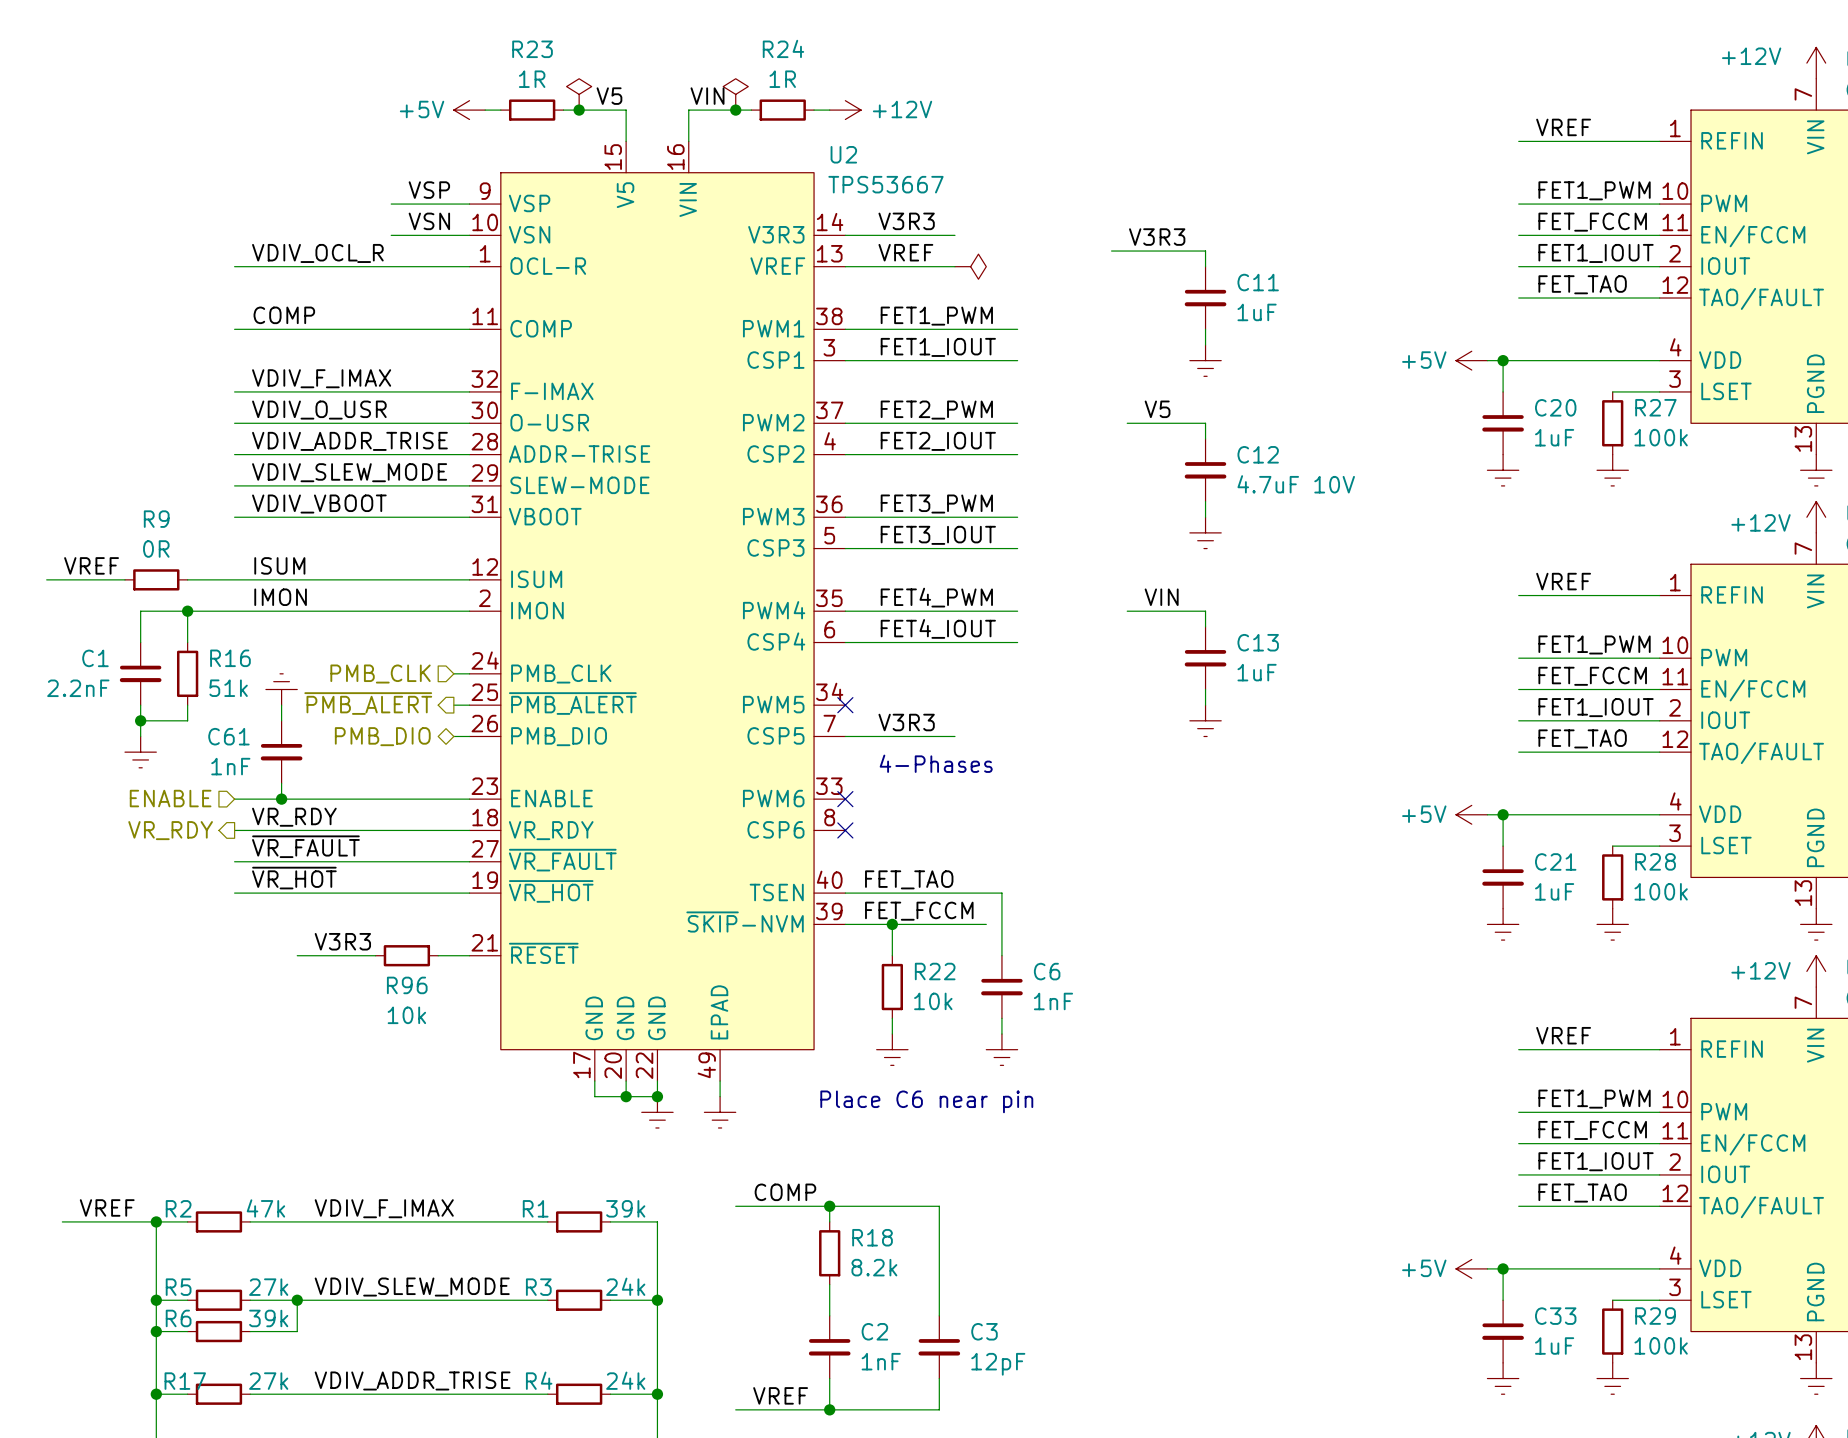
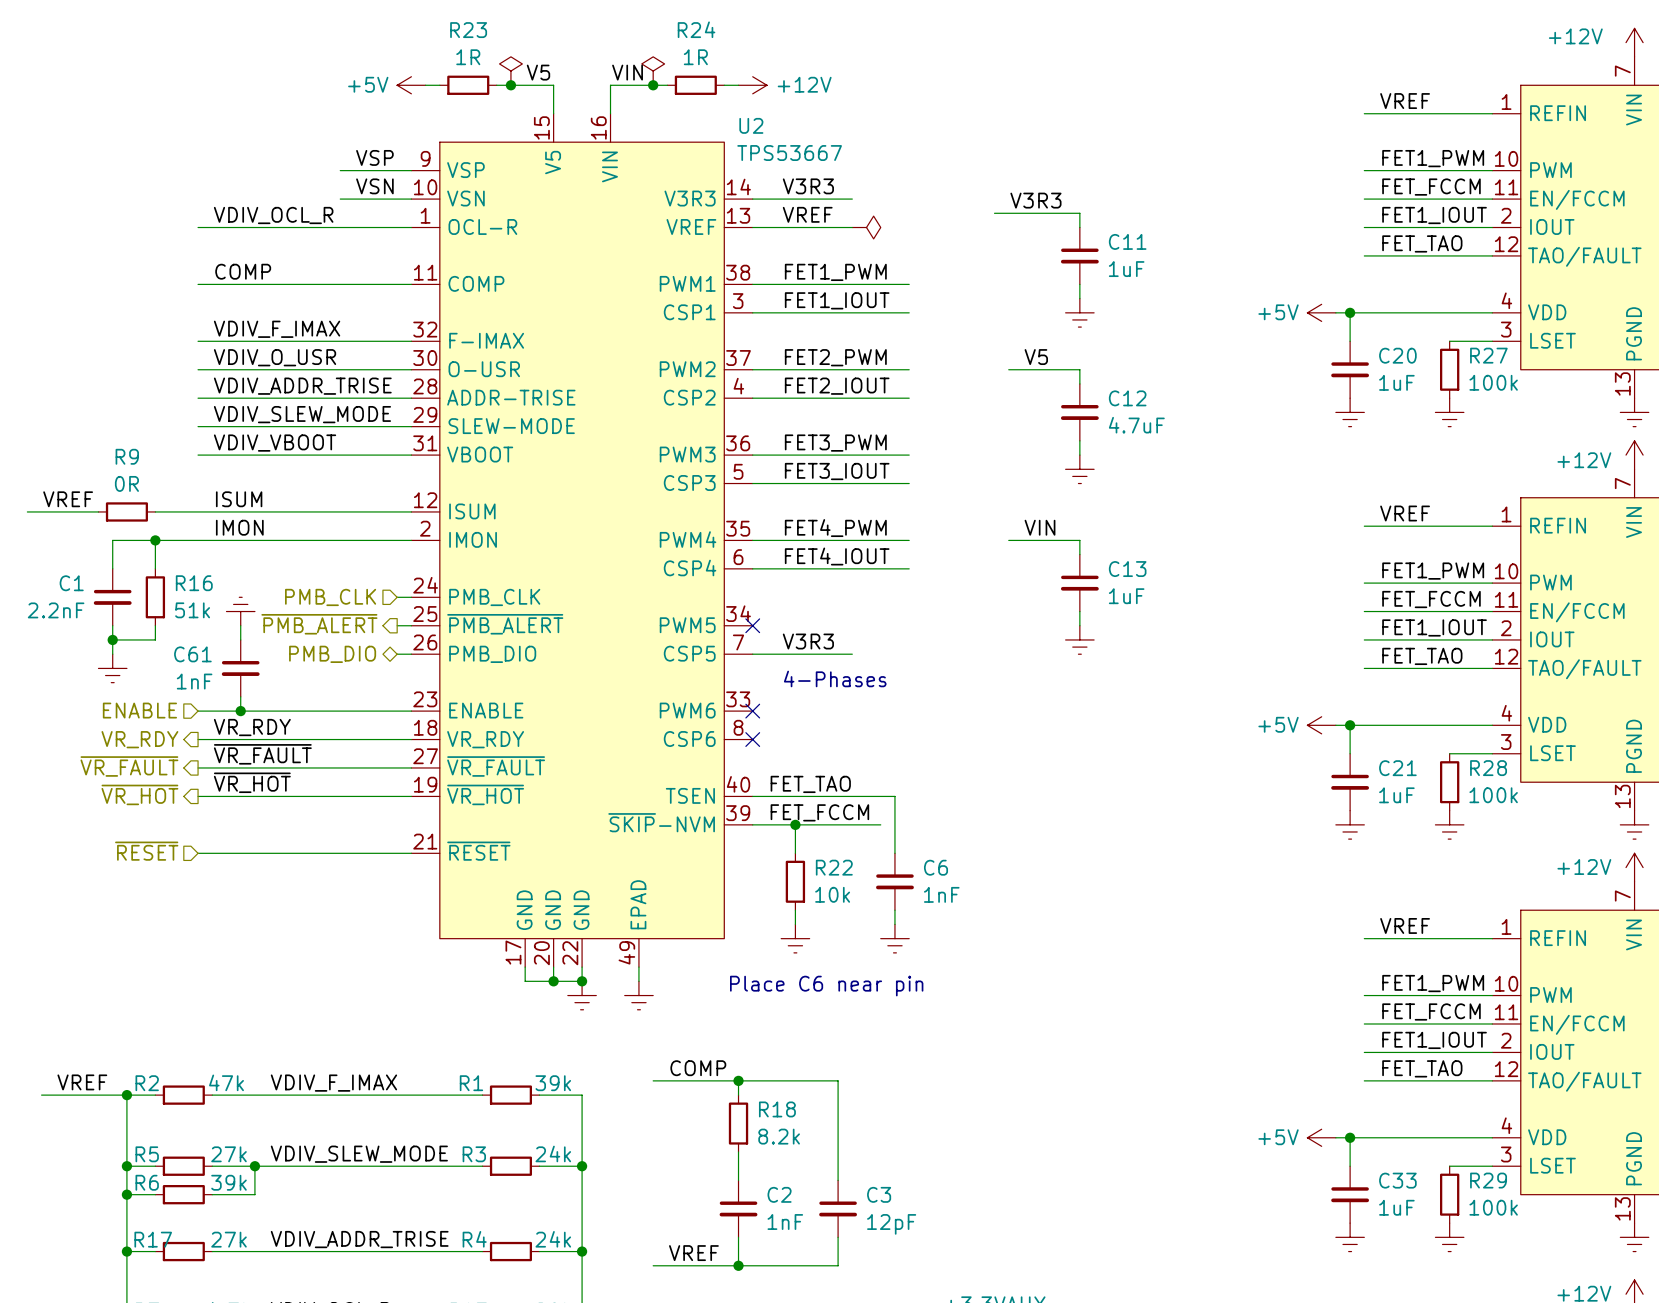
C12 value: 4.7uF 10V (1296, 484) -> 4.7uF (1136, 425)
hierarchical label: none -> ~{VR_FAULT} (129, 766)
hierarchical label: none -> ~{VR_HOT} (139, 794)
label: V3R3 (342, 941) -> none
hierarchical label: none -> ~{RESET} (146, 851)
wire: none -> (198, 853) (254, 853)
wire: none -> (326, 853) (382, 853)
R96: 10k (406, 955) -> none

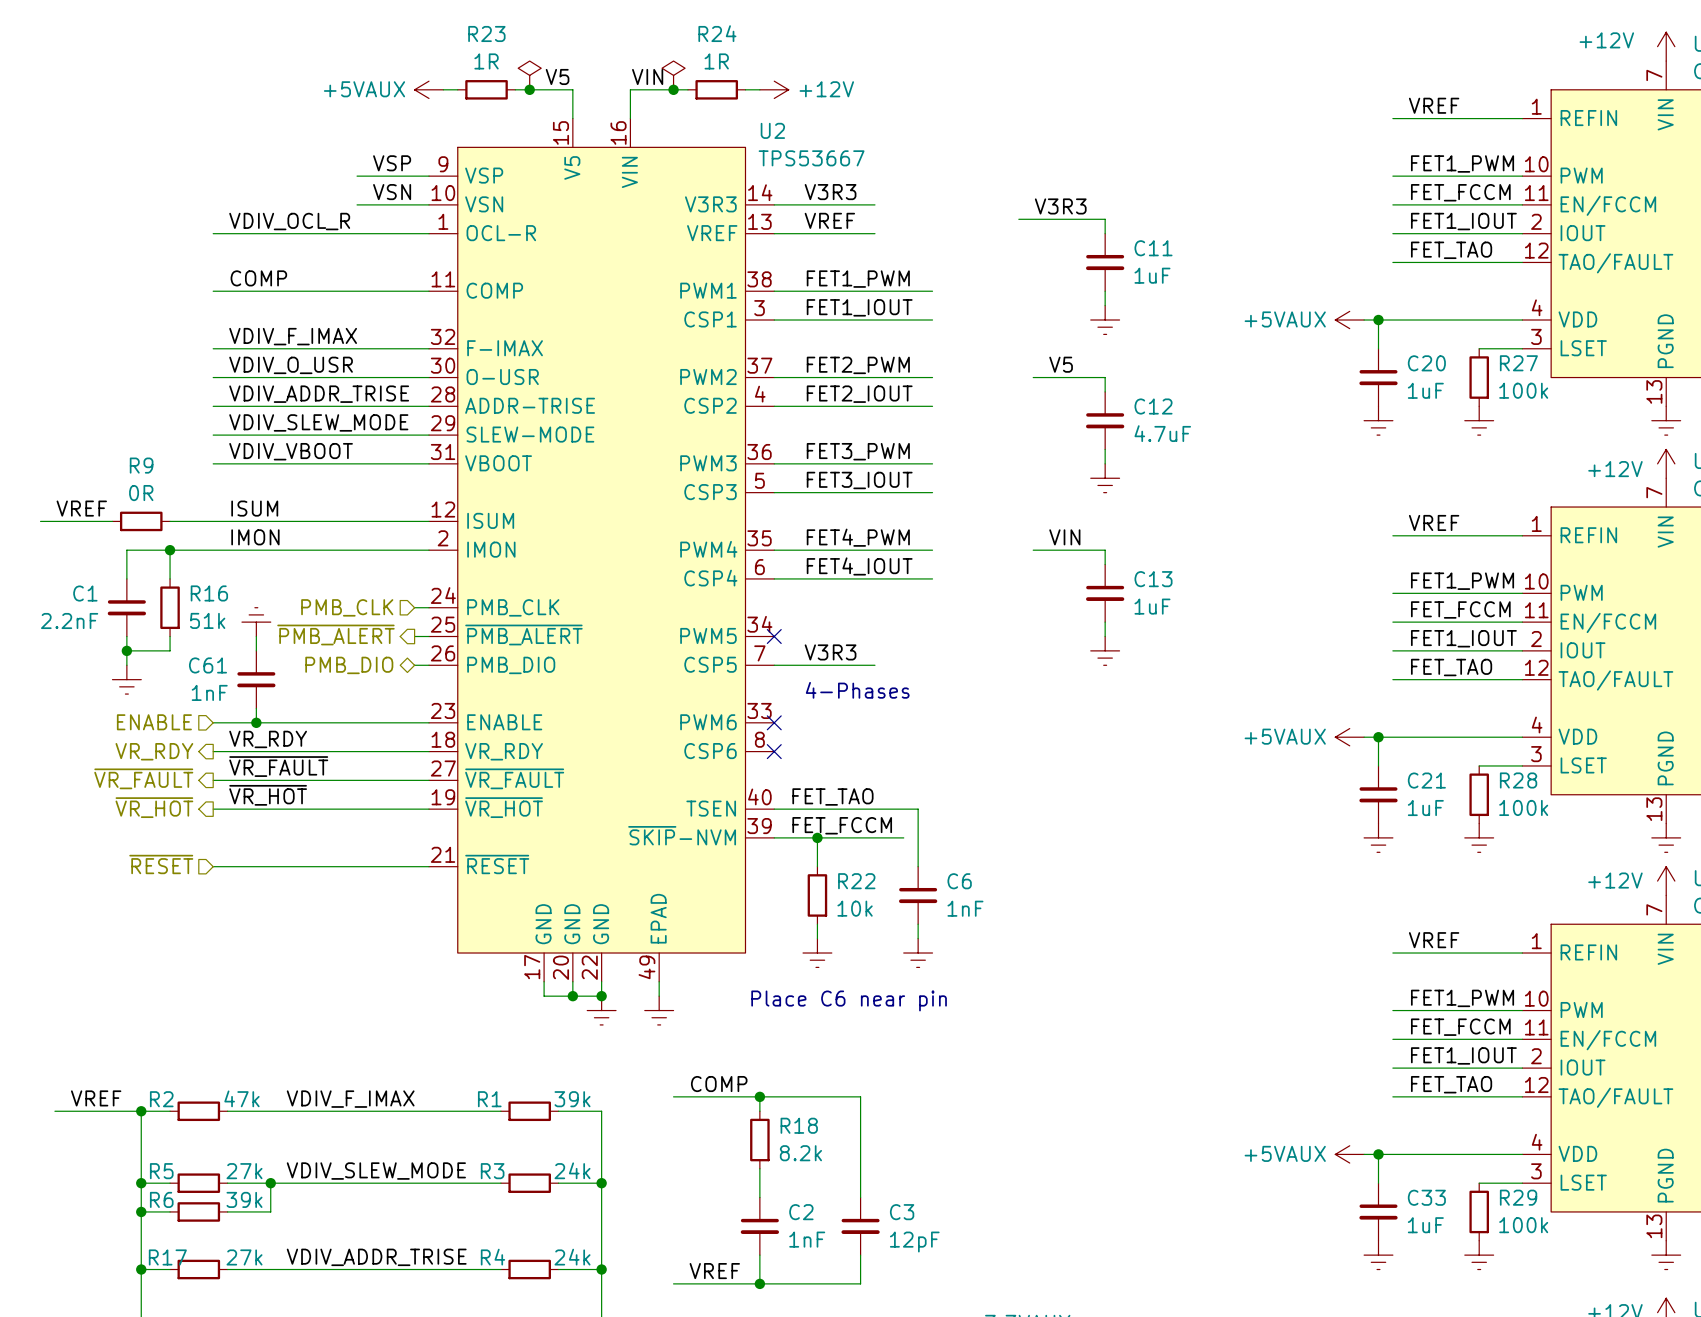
power symbol: +5V (411, 85) -> +5VAUX (428, 89)
power symbol: (866, 227) -> none
power symbol: +5V (1321, 312) -> +5VAUX (1349, 320)
power symbol: +5V (1321, 725) -> +5VAUX (1349, 737)
power symbol: +5V (1321, 1137) -> +5VAUX (1349, 1154)

